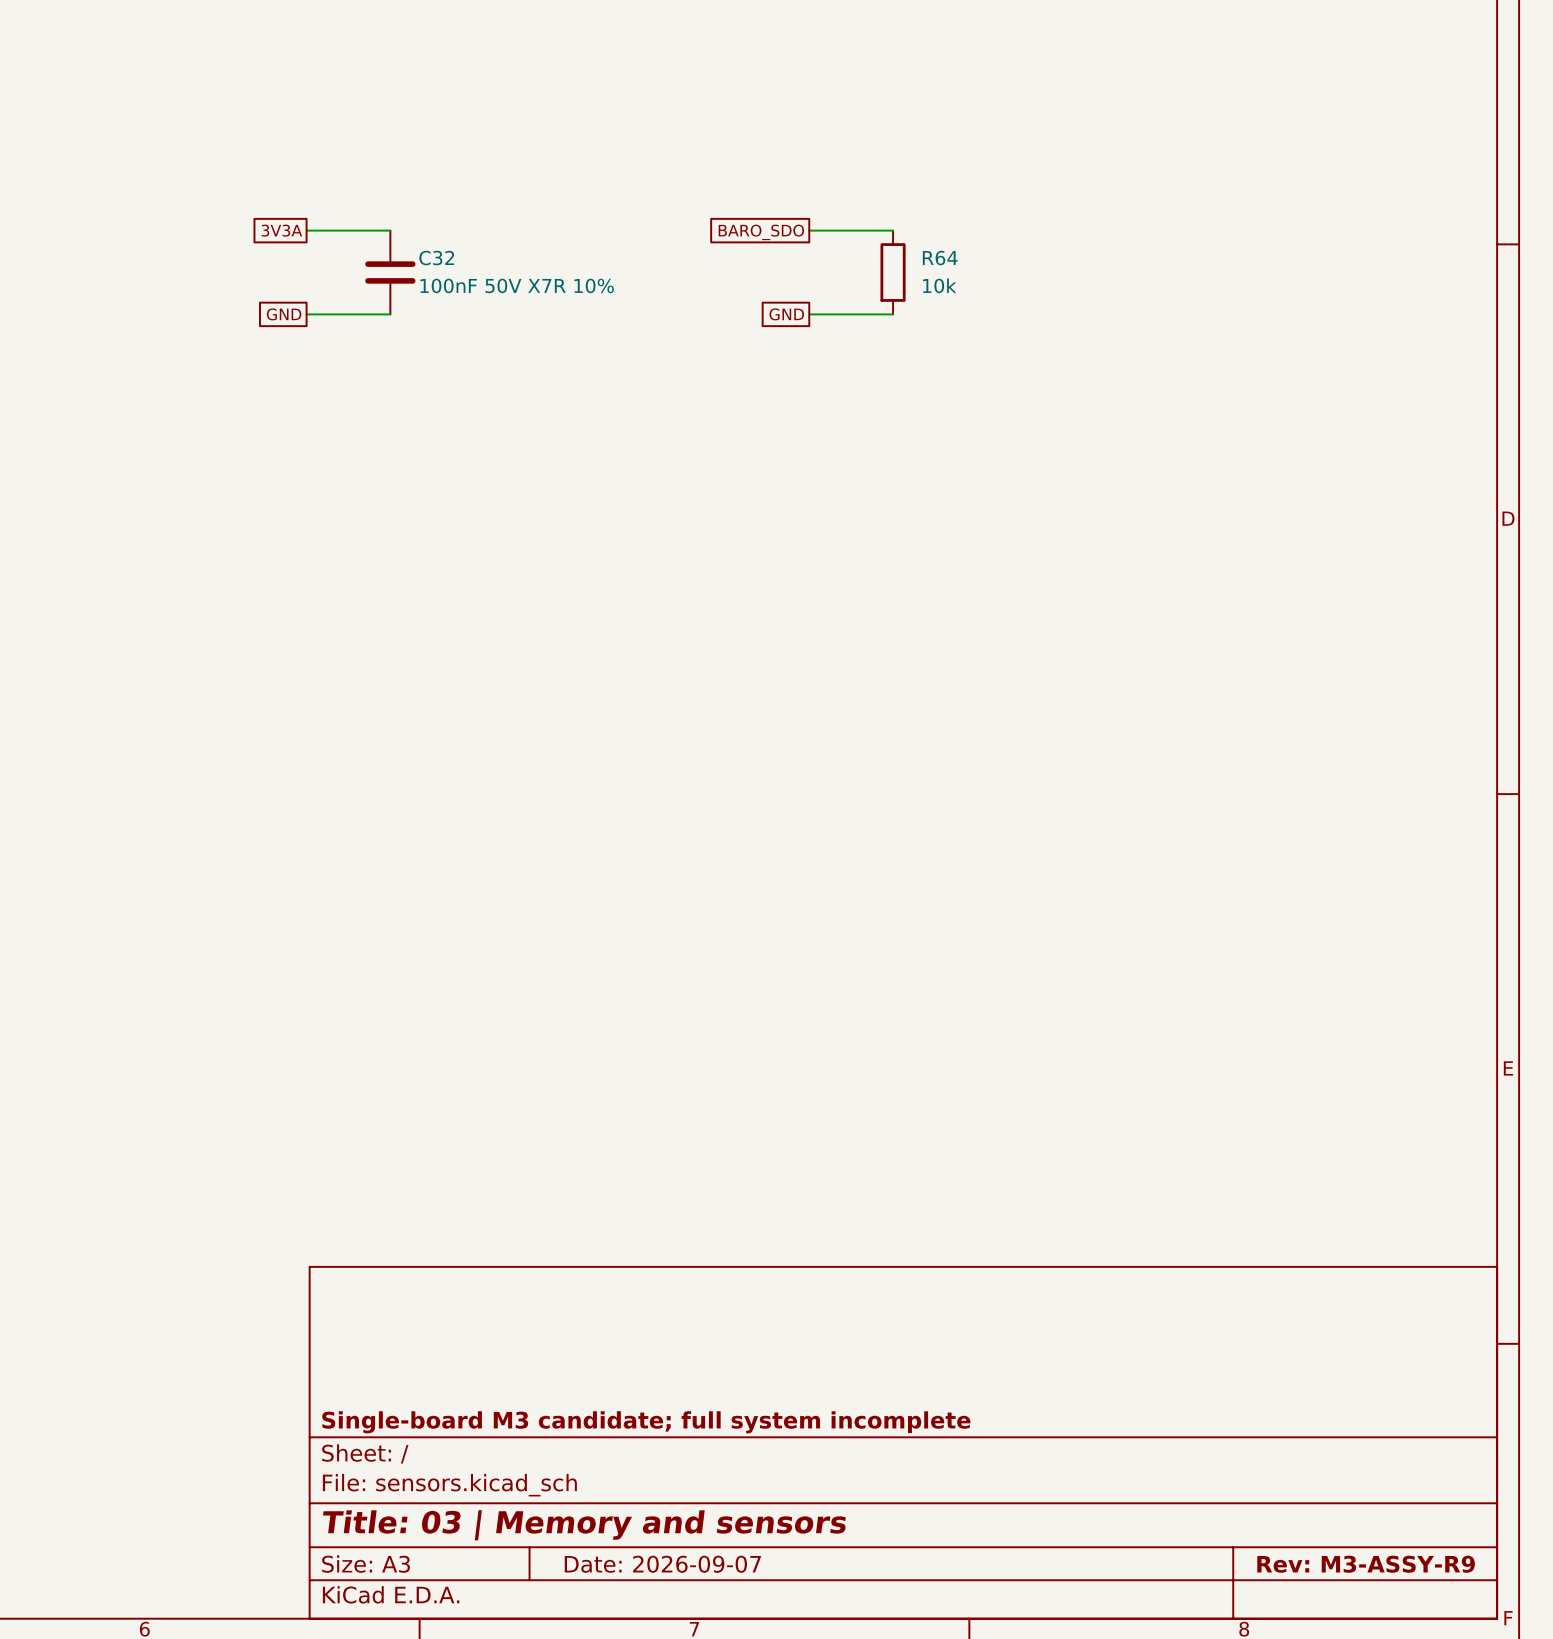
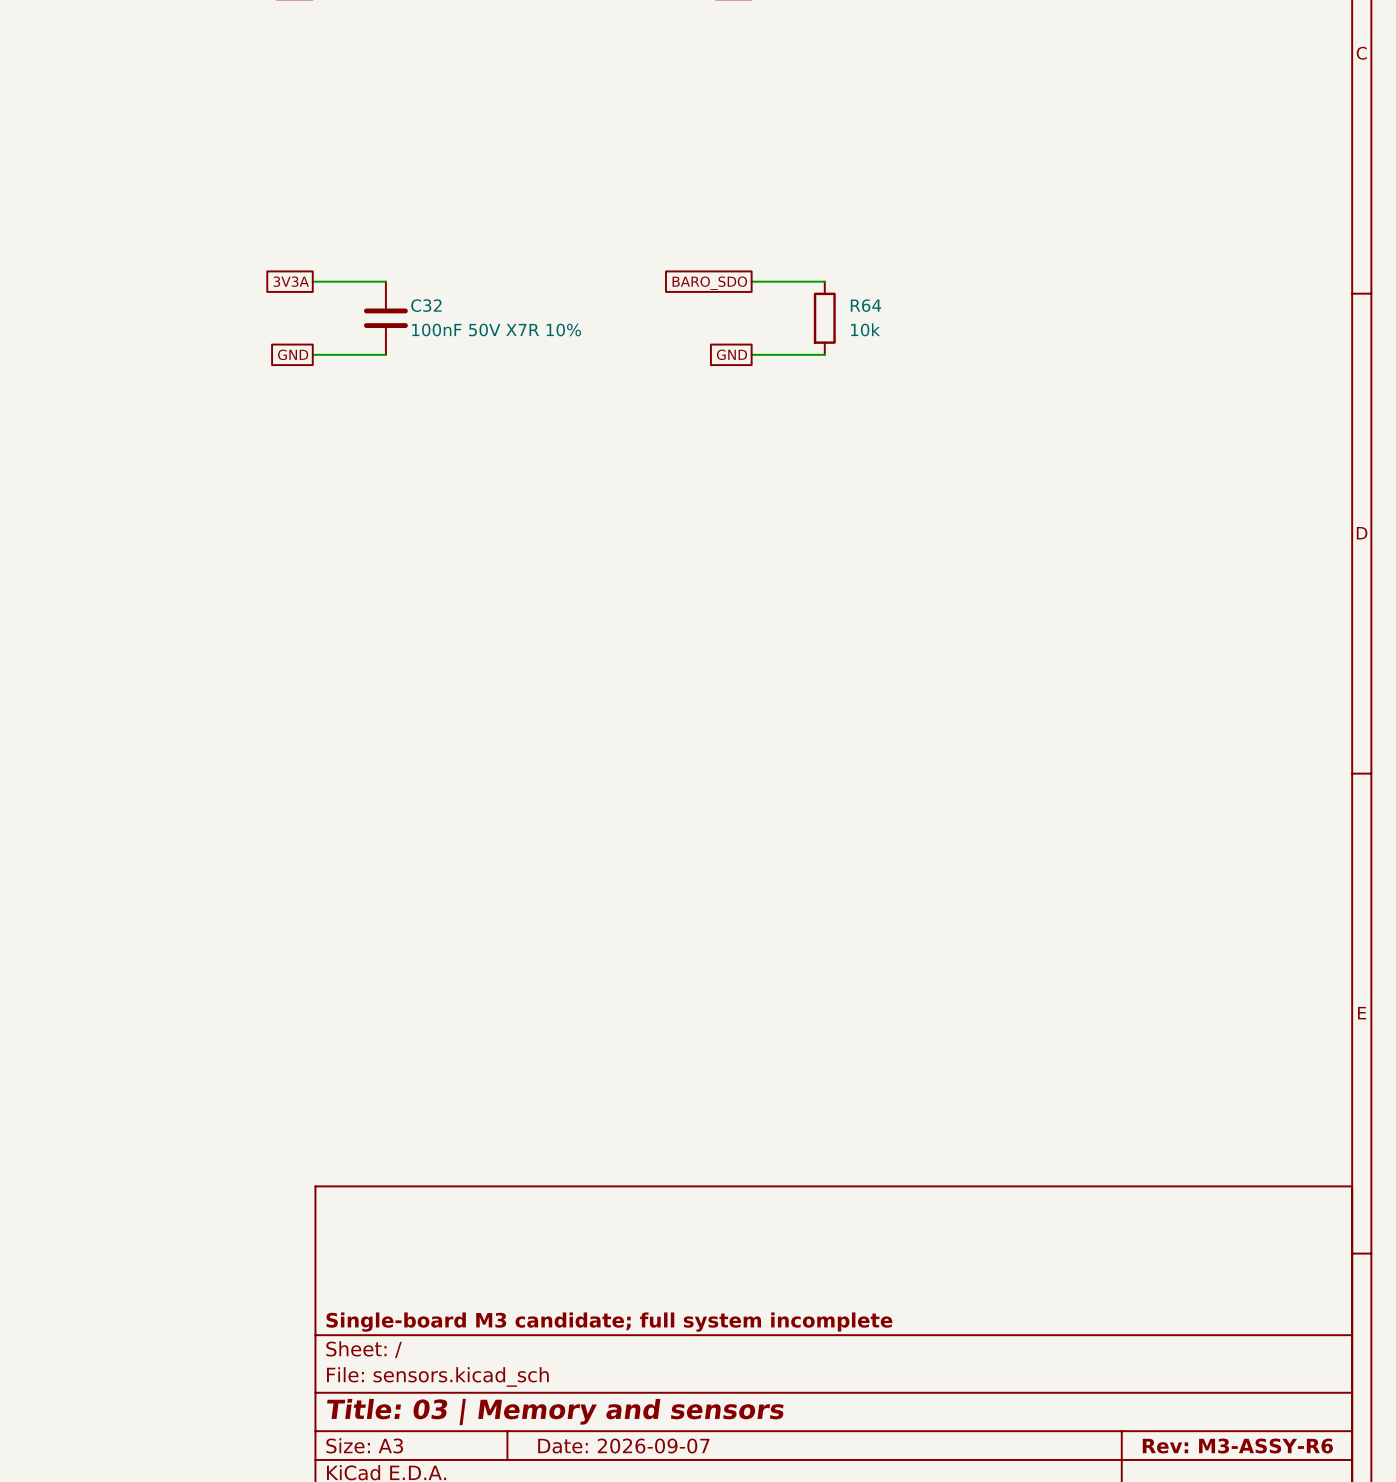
title block: Rev: M3-ASSY-R9 (1366, 1564) -> Rev: M3-ASSY-R6 (1237, 1446)

